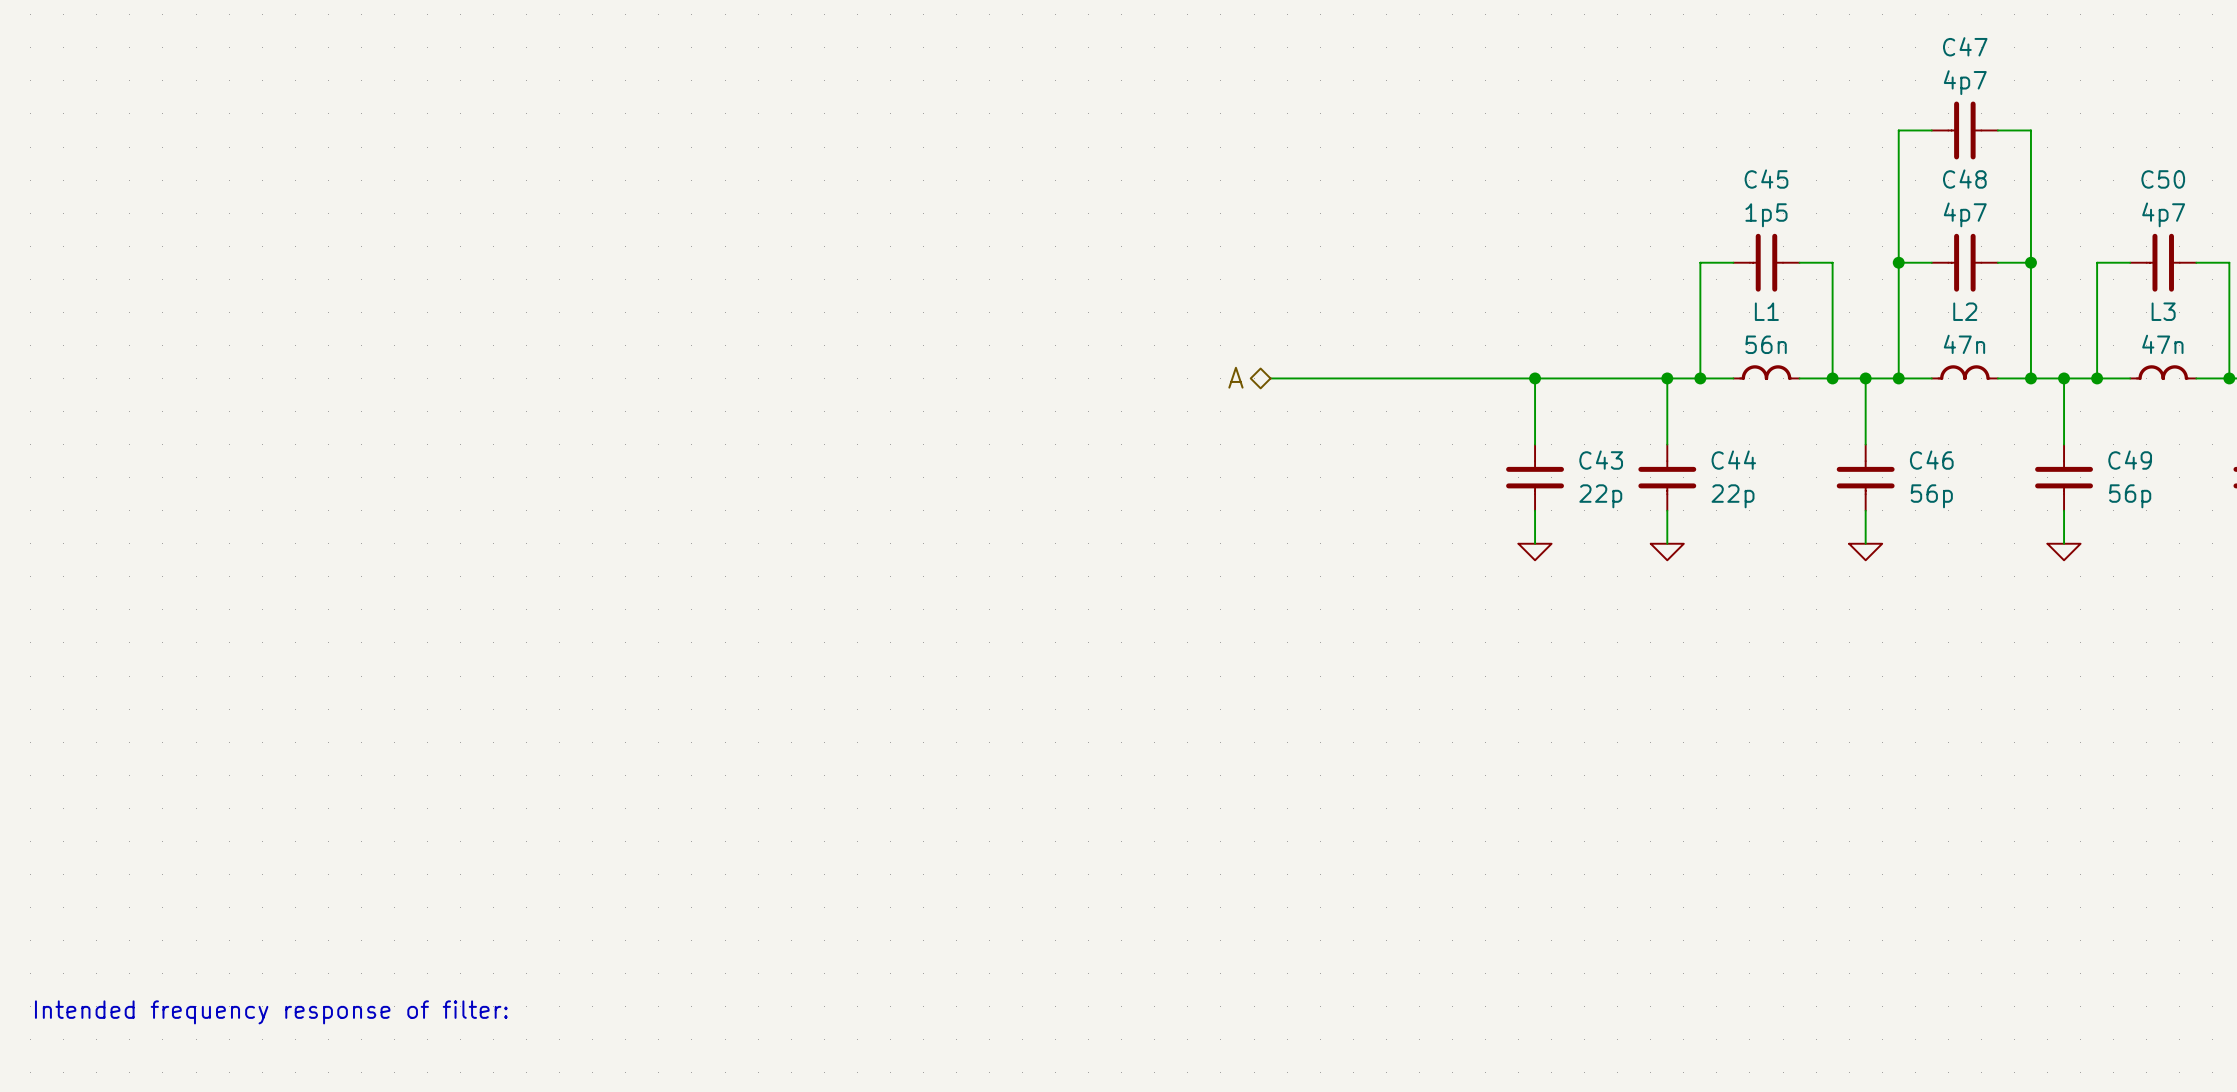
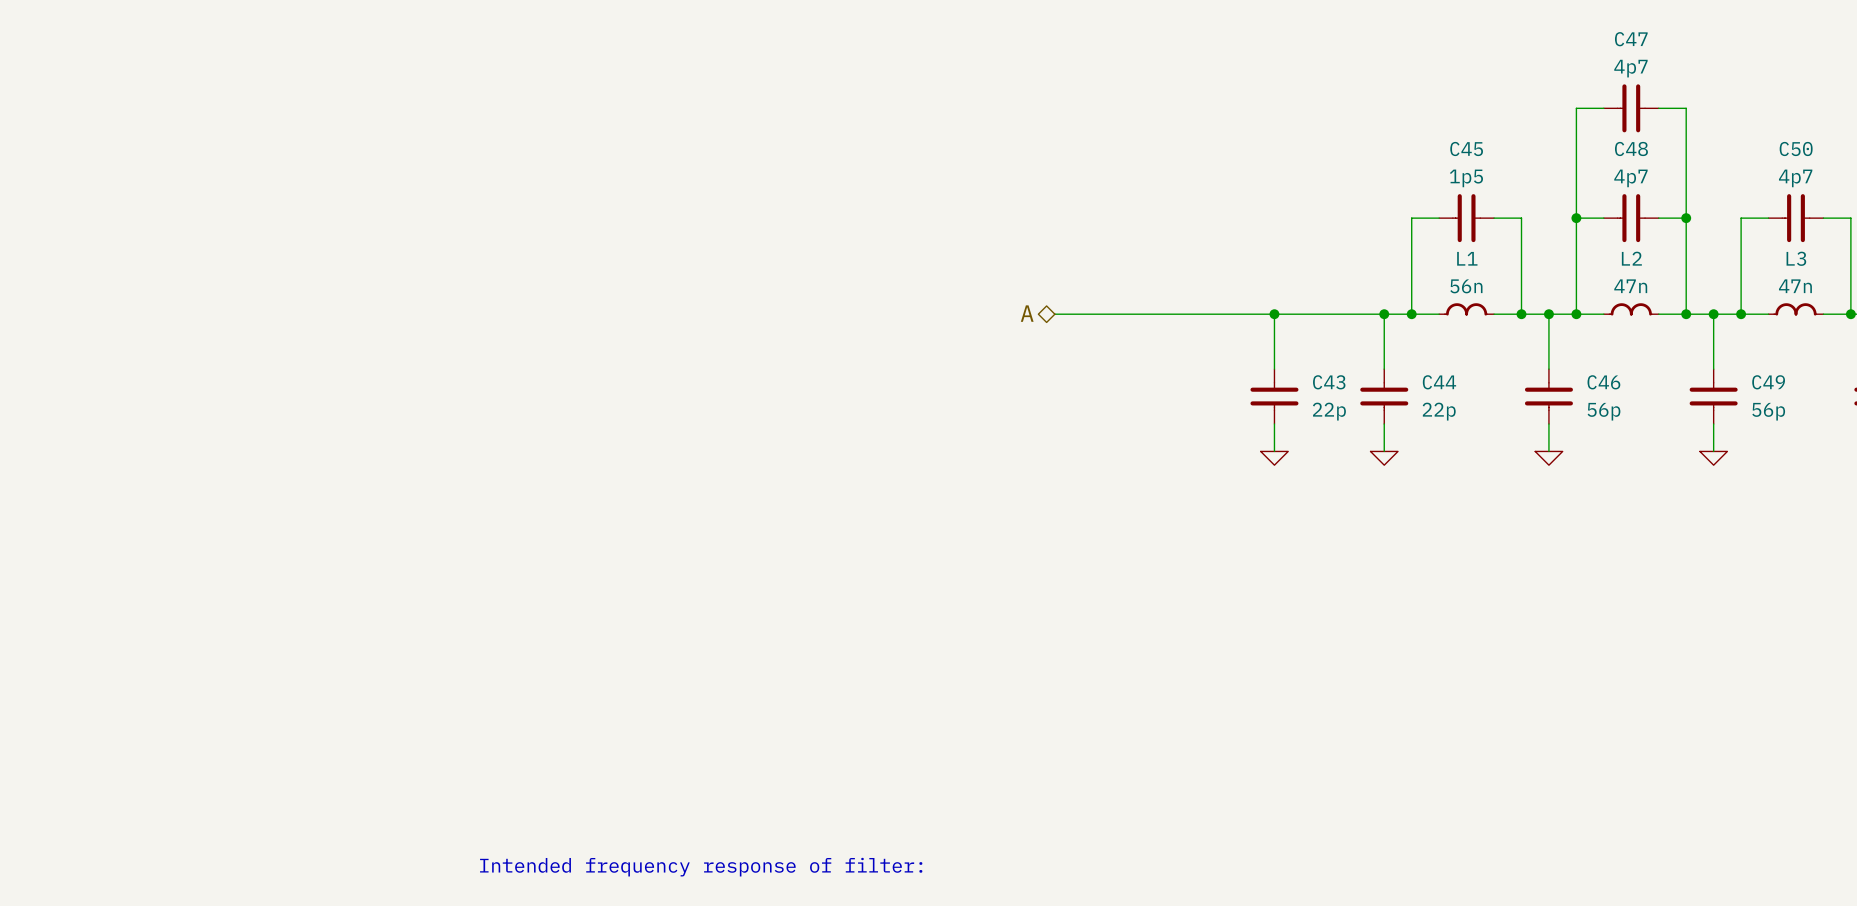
text: Intended frequency response of filter: (271, 1012) -> none
text: none -> Intended frequency response of filter: (701, 867)

